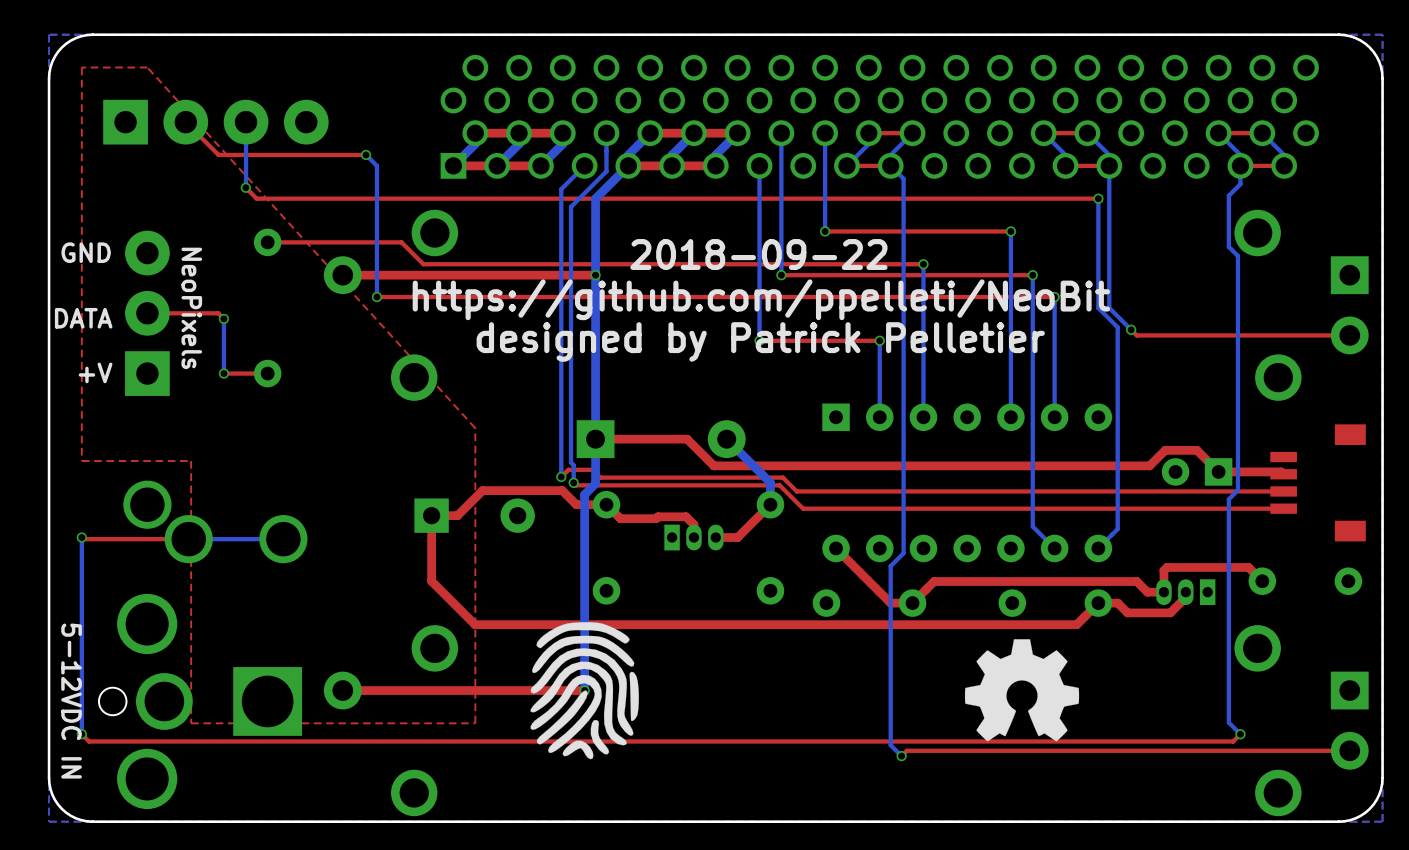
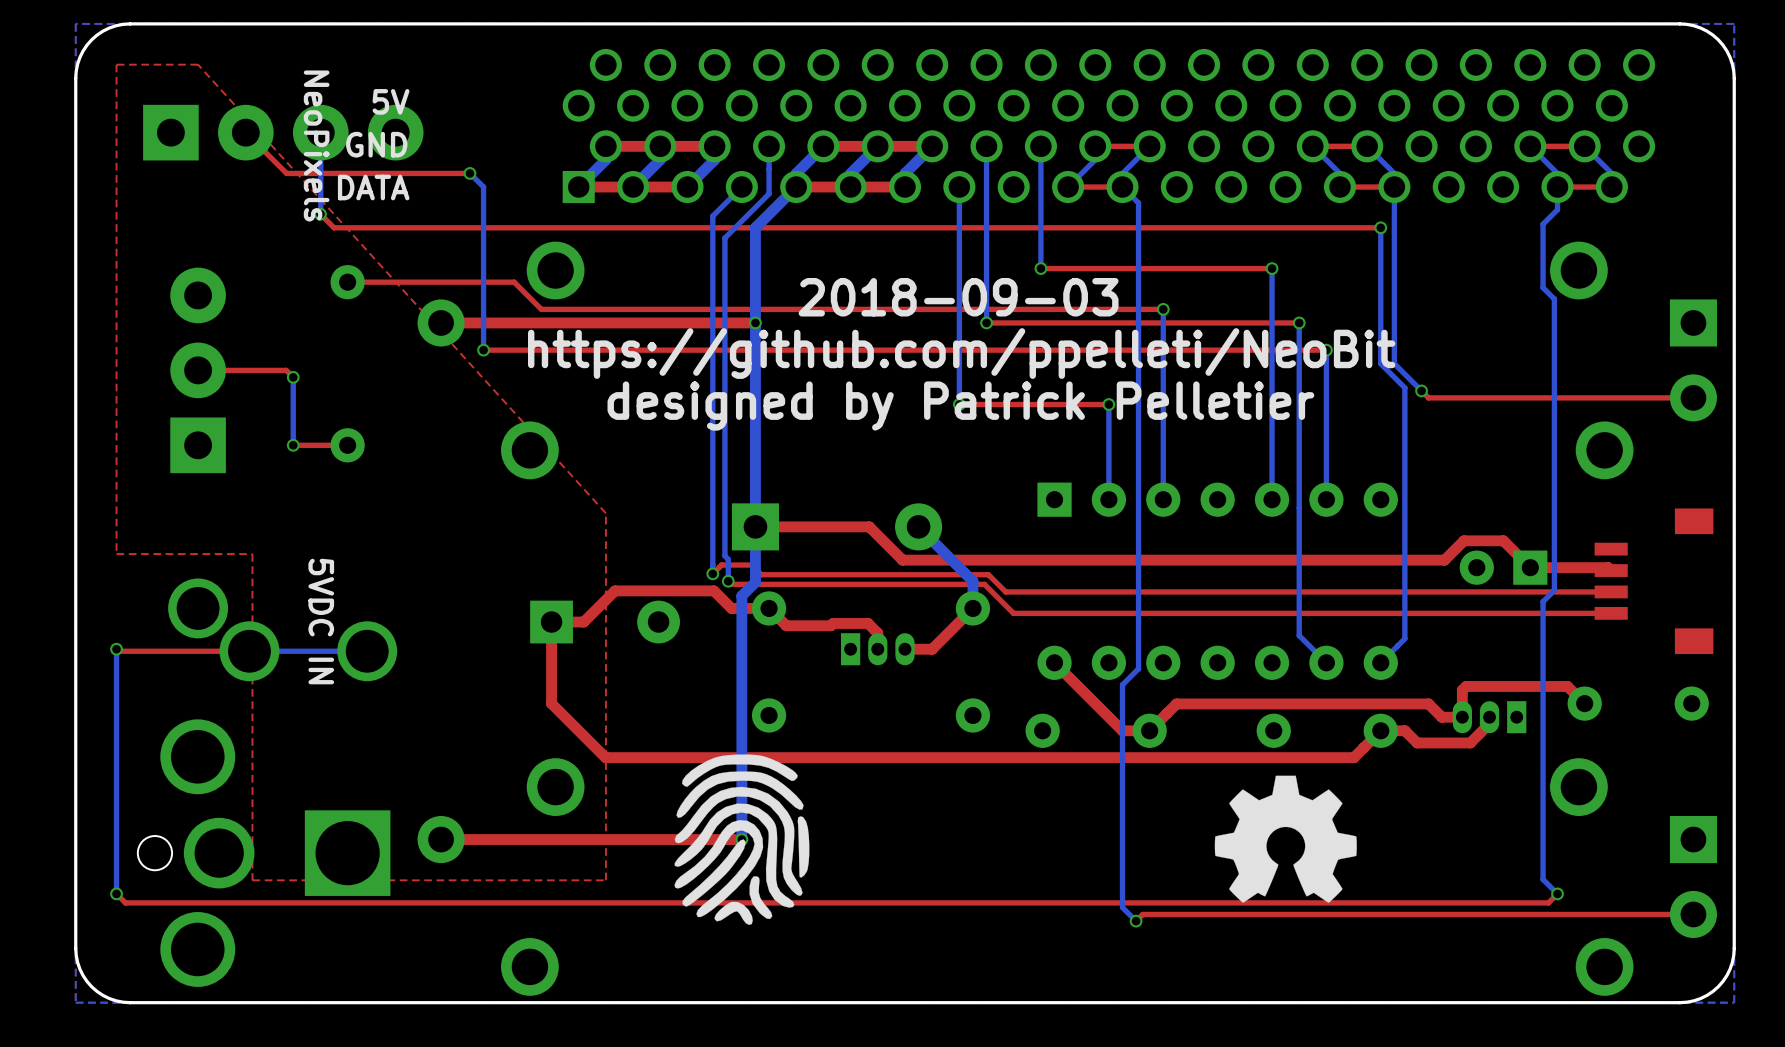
text: none -> 5V (391, 101)
text position: GND (86, 252) -> GND (376, 144)
text: 2018-09-22 (758, 254) -> 2018-09-03 (958, 297)
text position: NeoPixels (191, 308) -> NeoPixels (316, 146)
text position: DATA (83, 318) -> DATA (373, 187)
text: +V (95, 372) -> none
text: none -> 5VDC IN (321, 621)
text: 5-12VDC IN (71, 701) -> none

